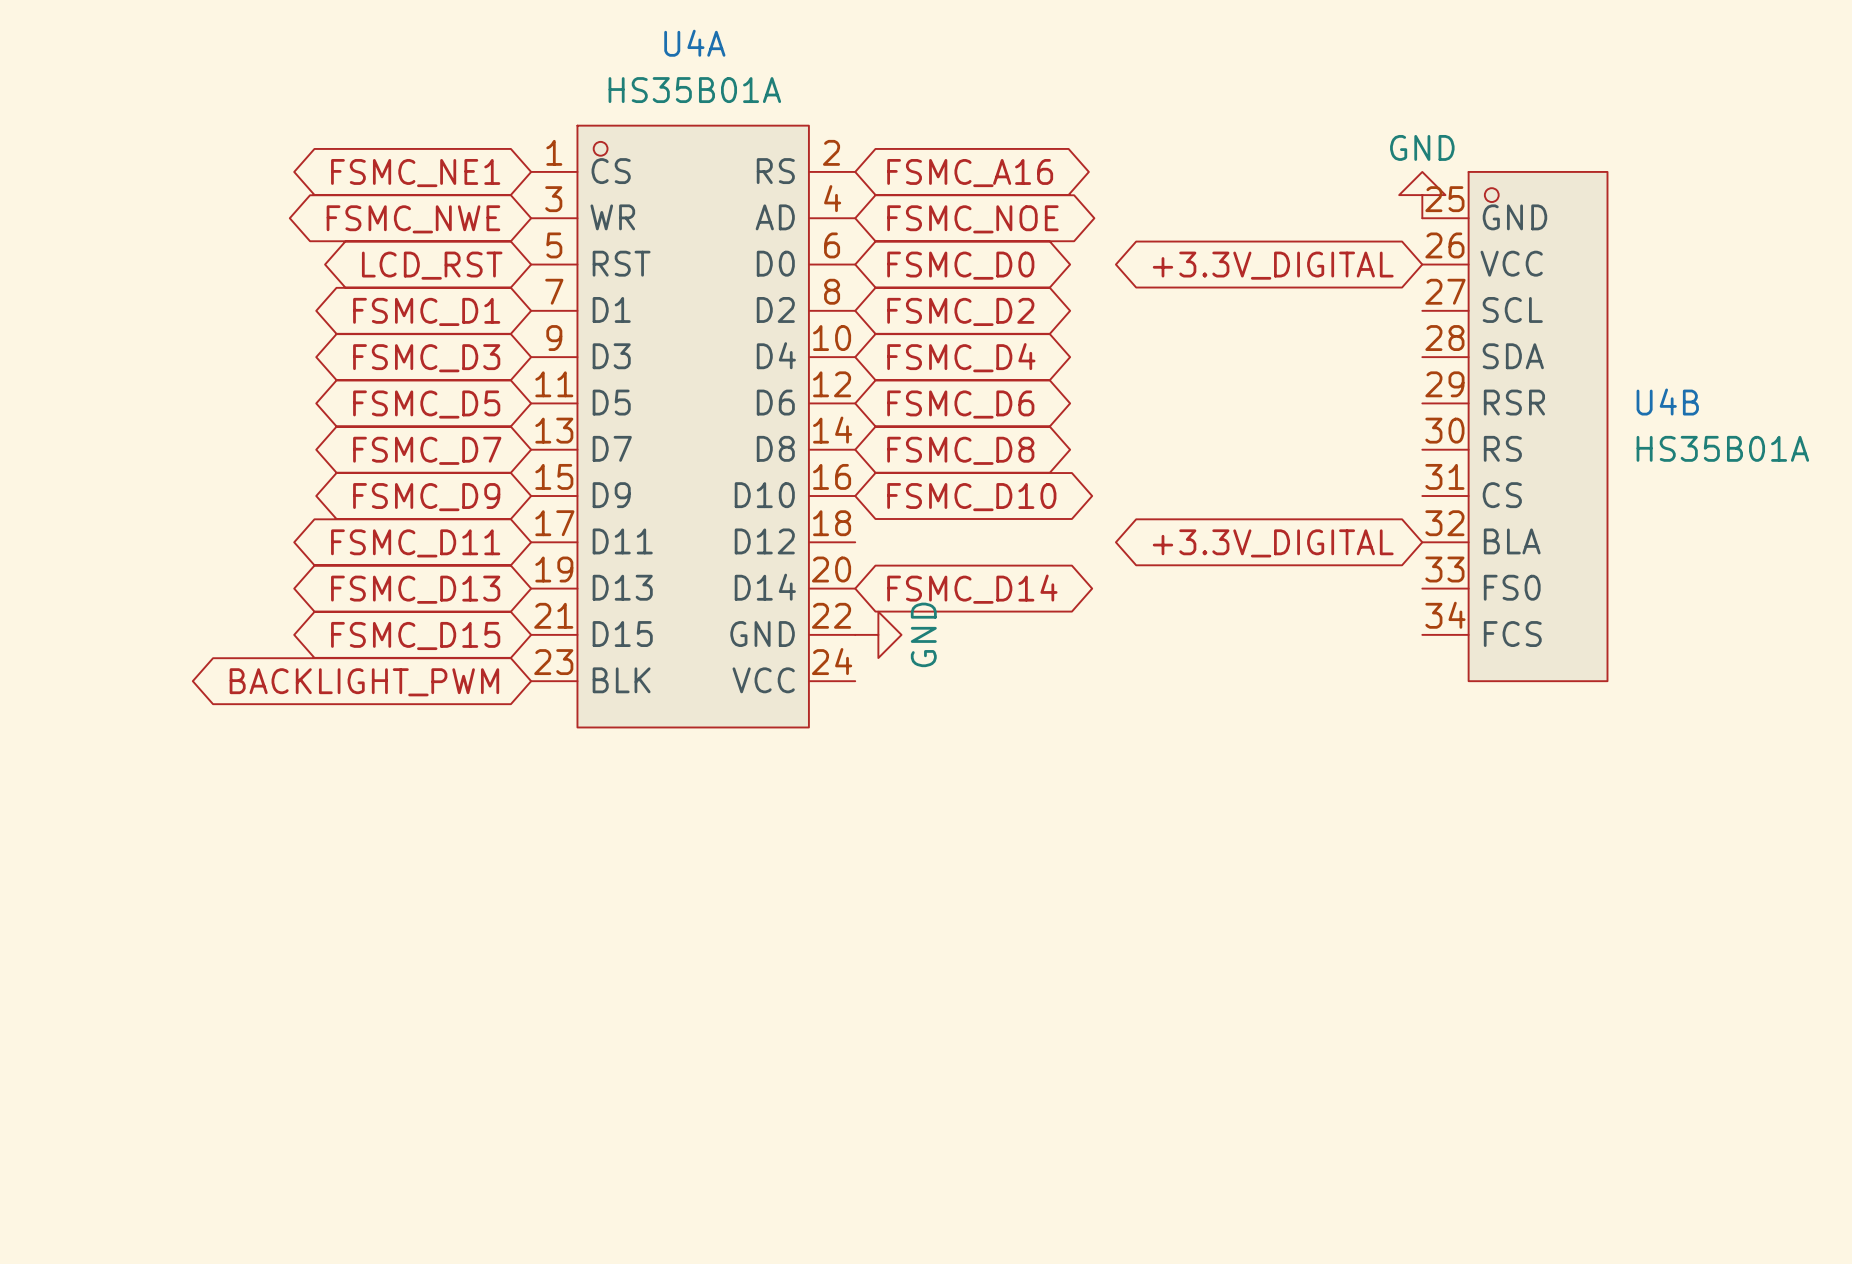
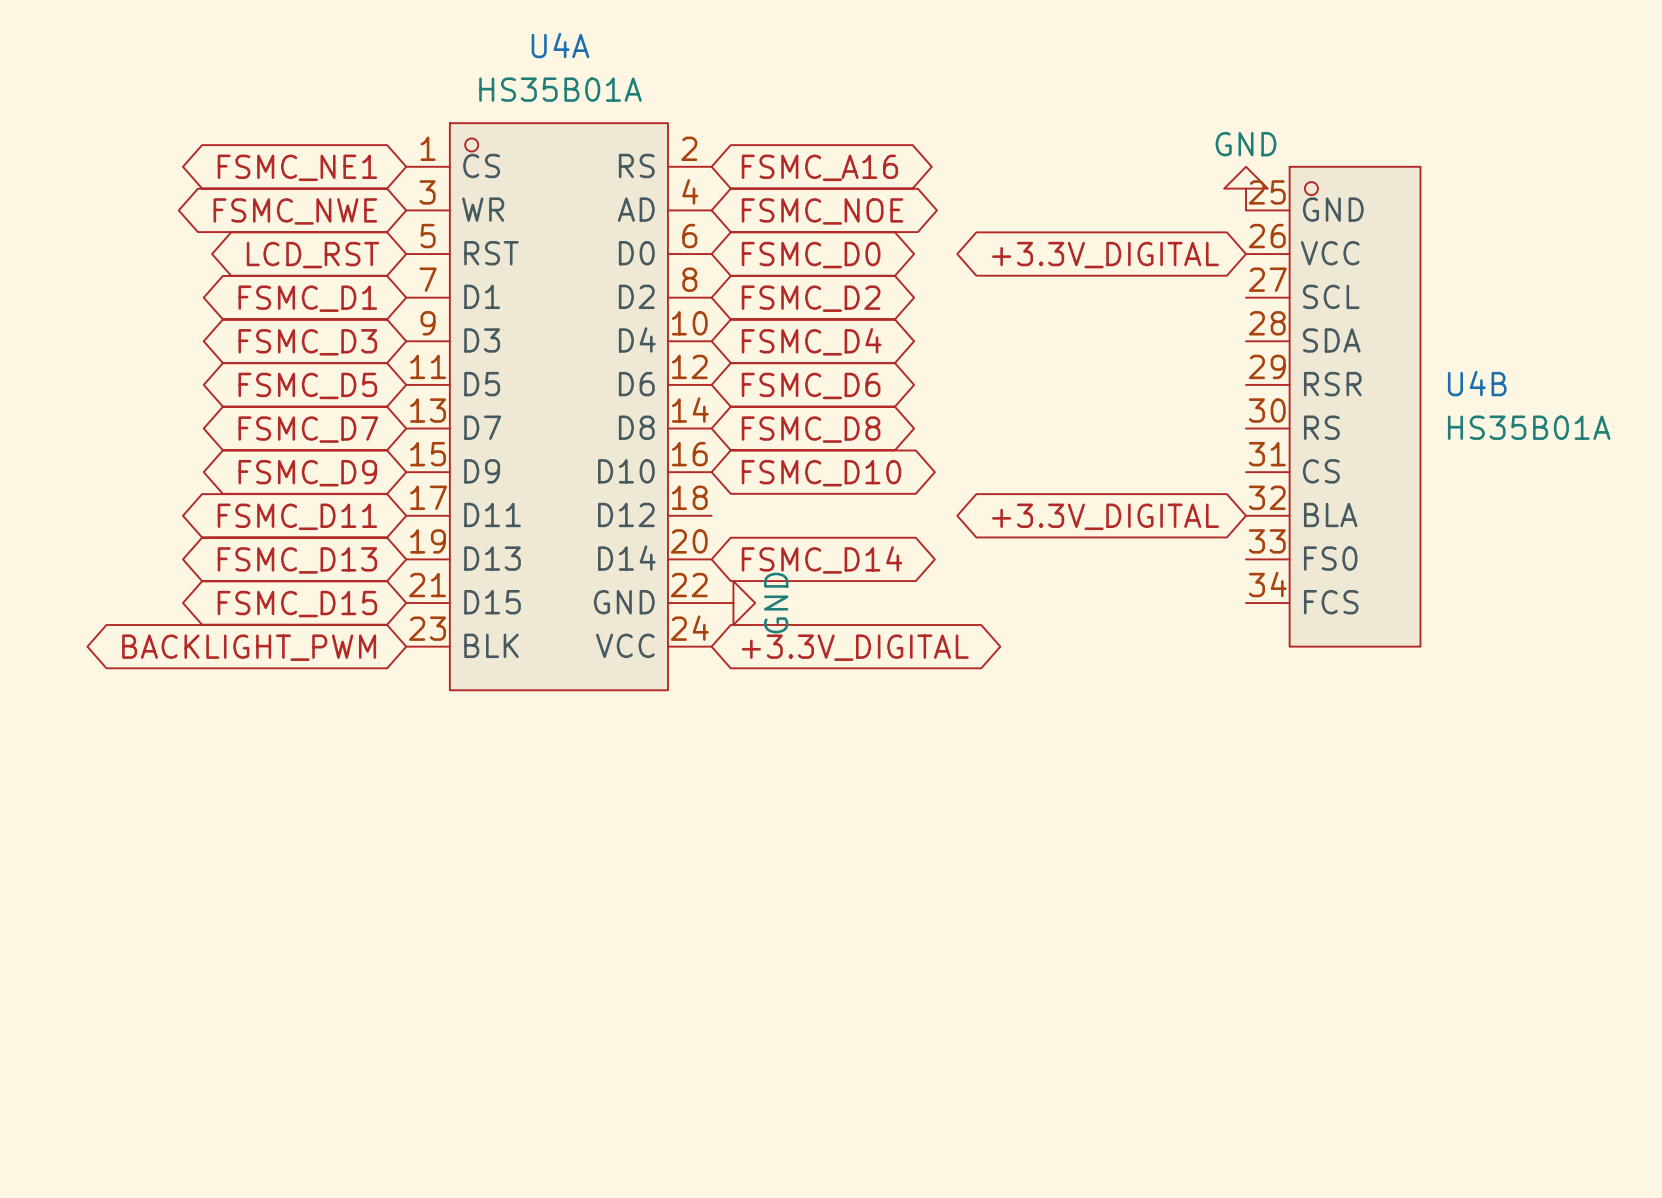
global label: none -> +3.3V_DIGITAL (855, 647)

